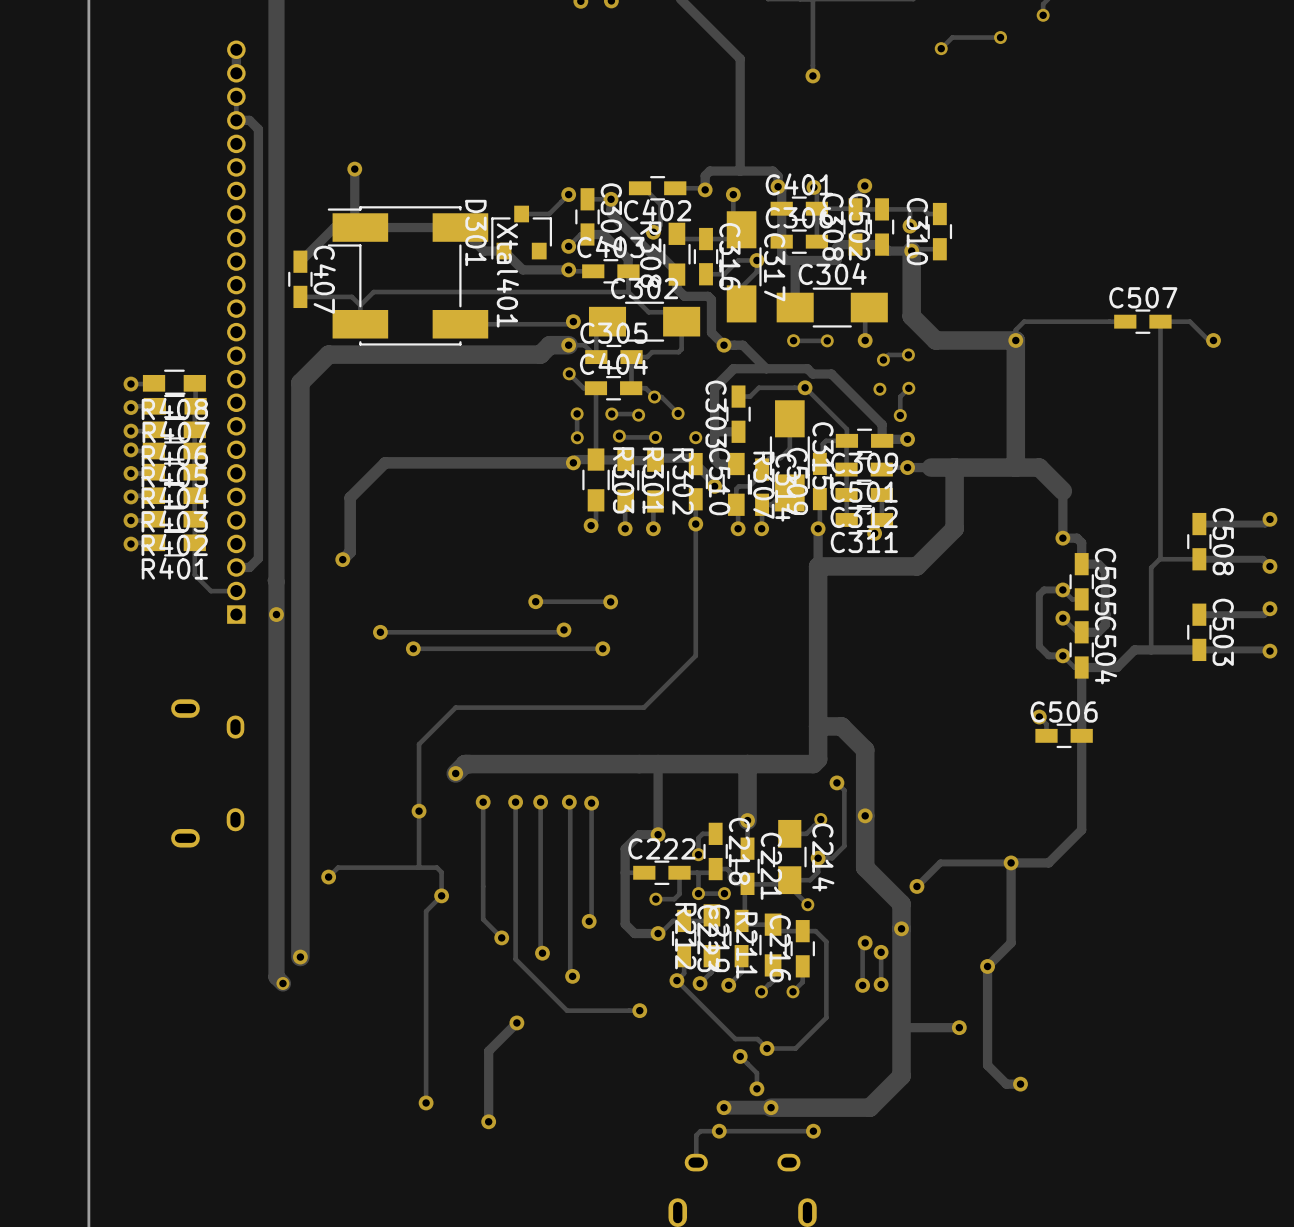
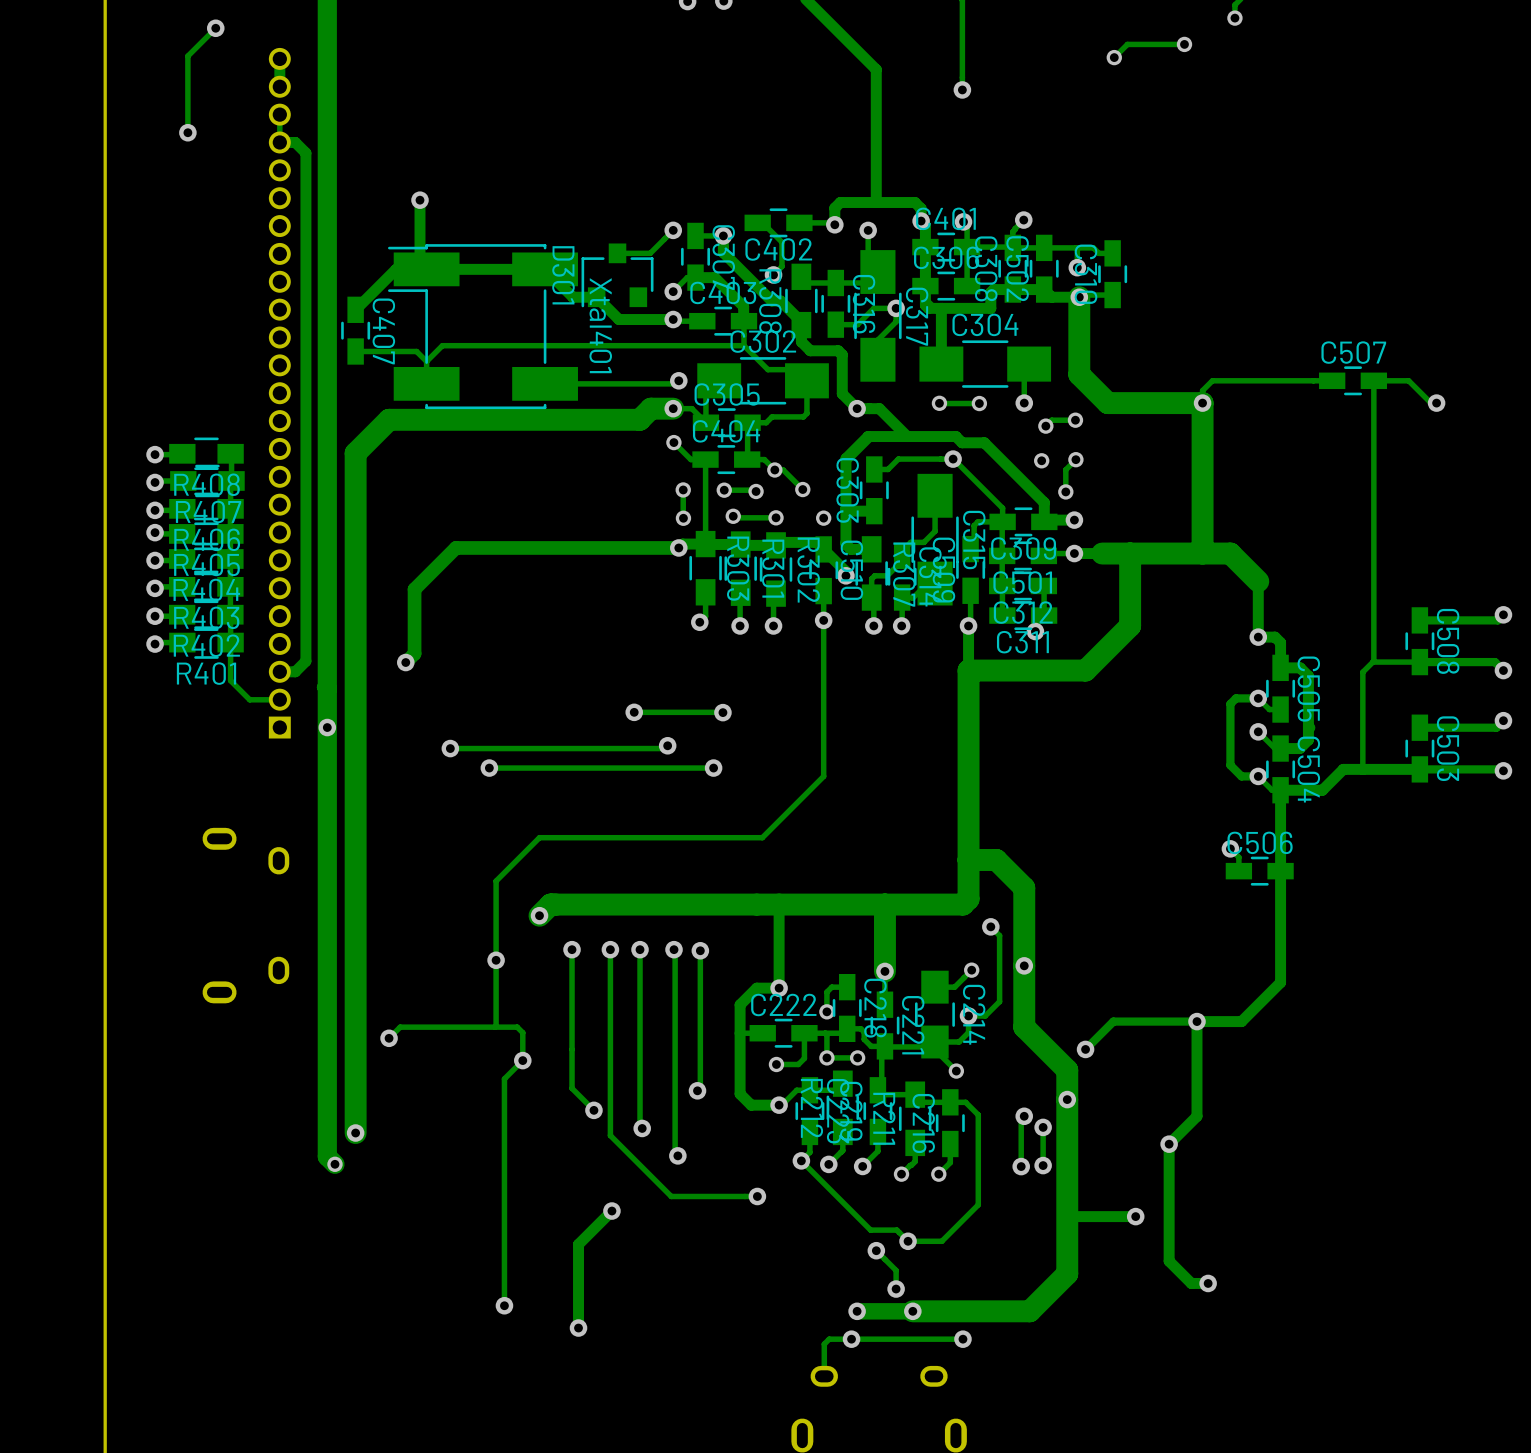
track: none -> (215, 28) (187, 56) (187, 132)
via: none -> (215, 28)
via: none -> (187, 132)

